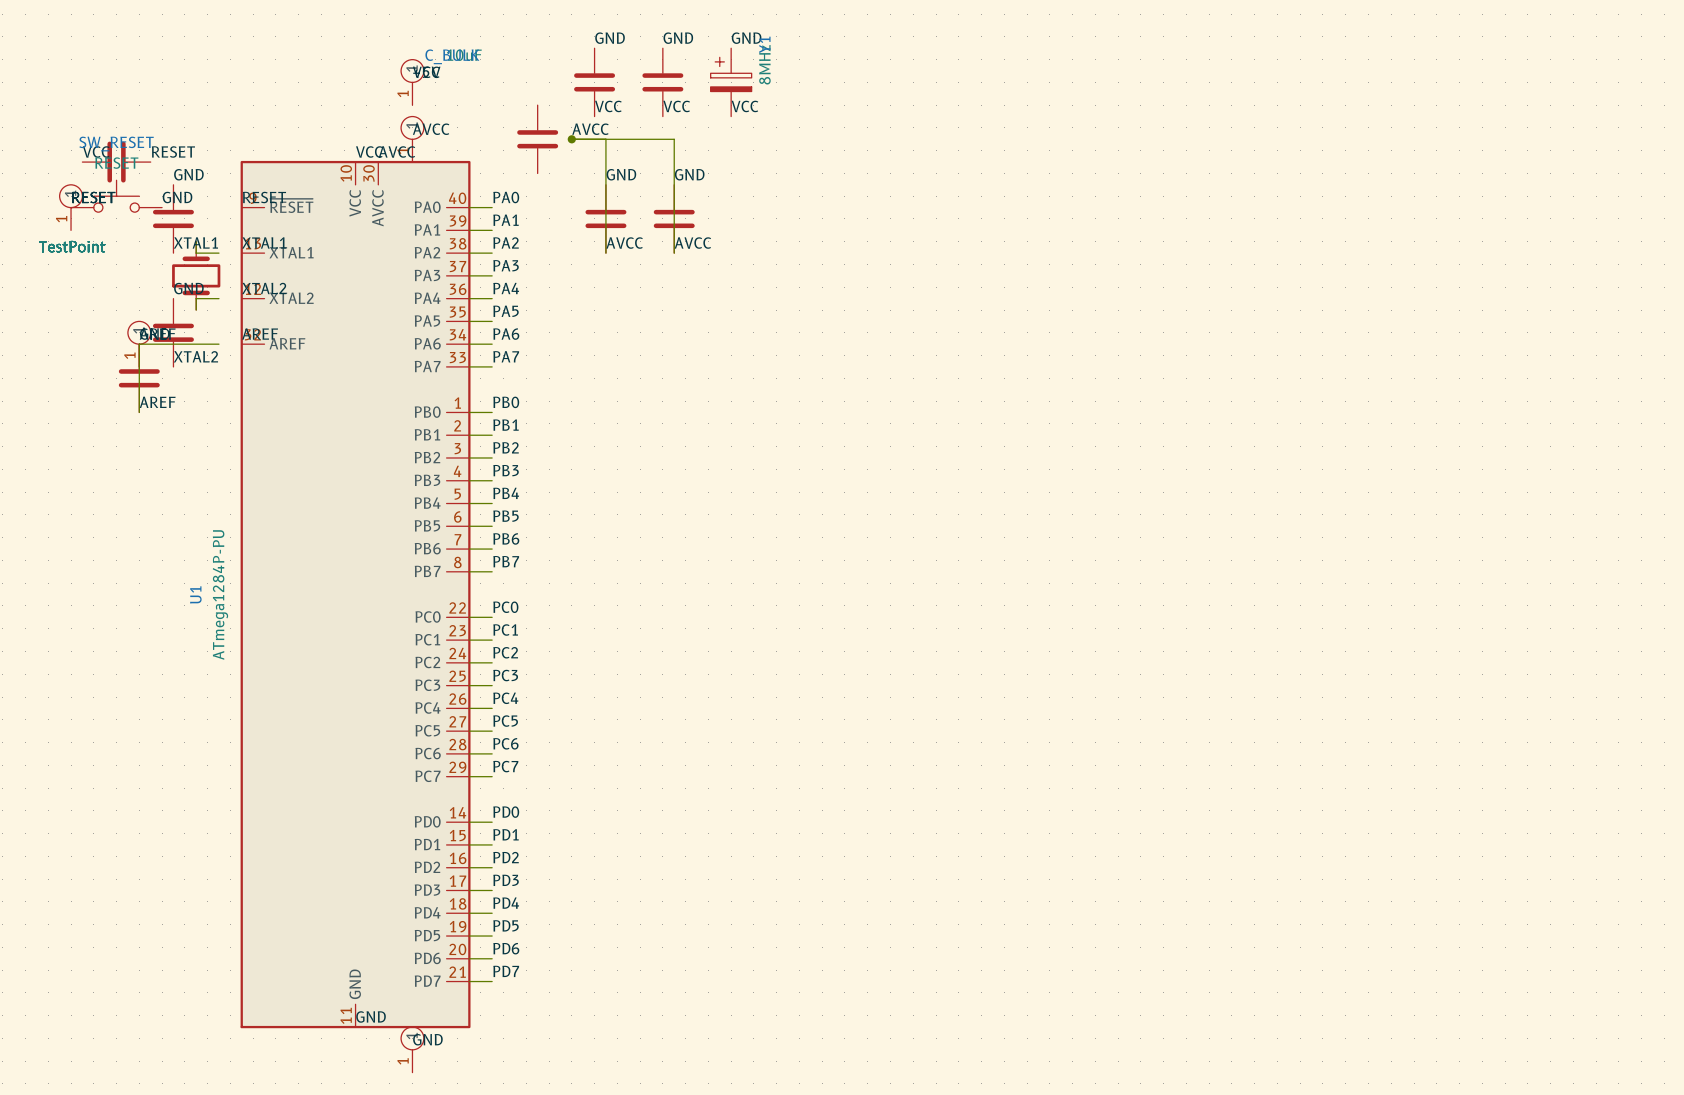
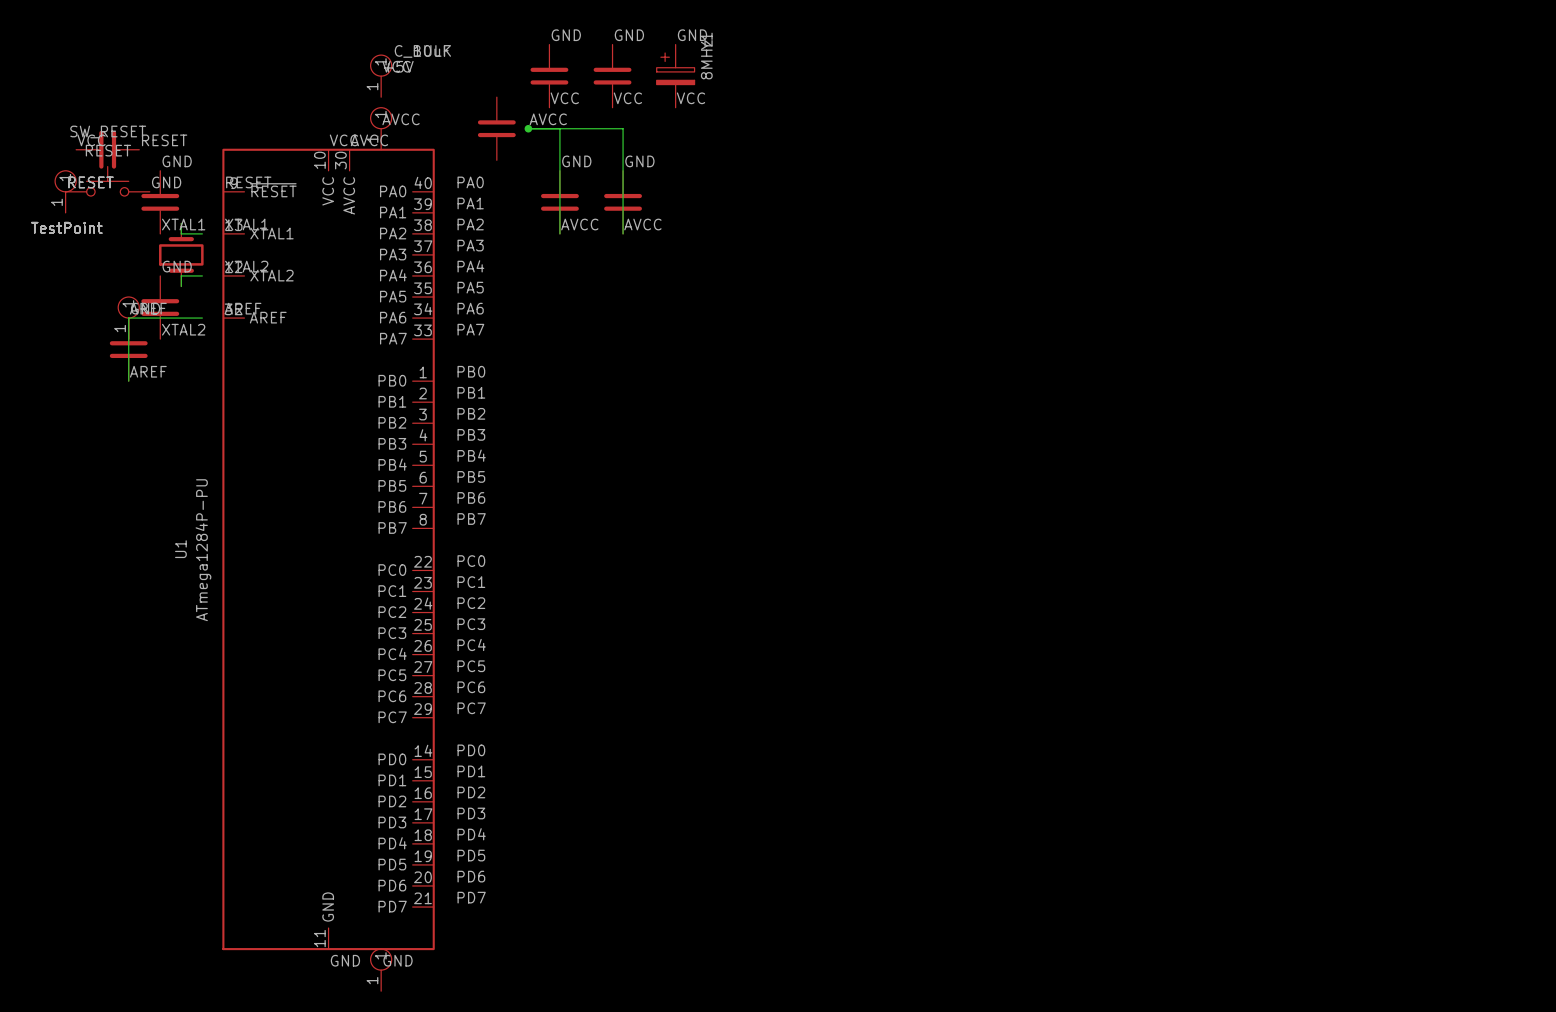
wire: (469, 207) (492, 207) -> none
wire: (469, 230) (492, 230) -> none
wire: (469, 253) (492, 253) -> none
wire: (469, 275) (492, 275) -> none
wire: (469, 298) (492, 298) -> none
wire: (469, 321) (492, 321) -> none
wire: (469, 344) (492, 344) -> none
wire: (469, 366) (492, 366) -> none
wire: (469, 412) (492, 412) -> none
wire: (469, 435) (492, 435) -> none
wire: (469, 457) (492, 457) -> none
wire: (469, 480) (492, 480) -> none
wire: (469, 503) (492, 503) -> none
wire: (469, 526) (492, 526) -> none
wire: (469, 549) (492, 549) -> none
wire: (469, 571) (492, 571) -> none
wire: (469, 617) (492, 617) -> none
wire: (469, 640) (492, 640) -> none
wire: (469, 662) (492, 662) -> none
wire: (469, 685) (492, 685) -> none
wire: (469, 708) (492, 708) -> none
wire: (469, 731) (492, 731) -> none
wire: (469, 753) (492, 753) -> none
wire: (469, 776) (492, 776) -> none
wire: (469, 822) (492, 822) -> none
wire: (469, 844) (492, 844) -> none
wire: (469, 867) (492, 867) -> none
wire: (469, 890) (492, 890) -> none
wire: (469, 913) (492, 913) -> none
wire: (469, 936) (492, 936) -> none
wire: (469, 958) (492, 958) -> none
wire: (469, 981) (492, 981) -> none
label position: GND (371, 1016) -> GND (345, 960)

